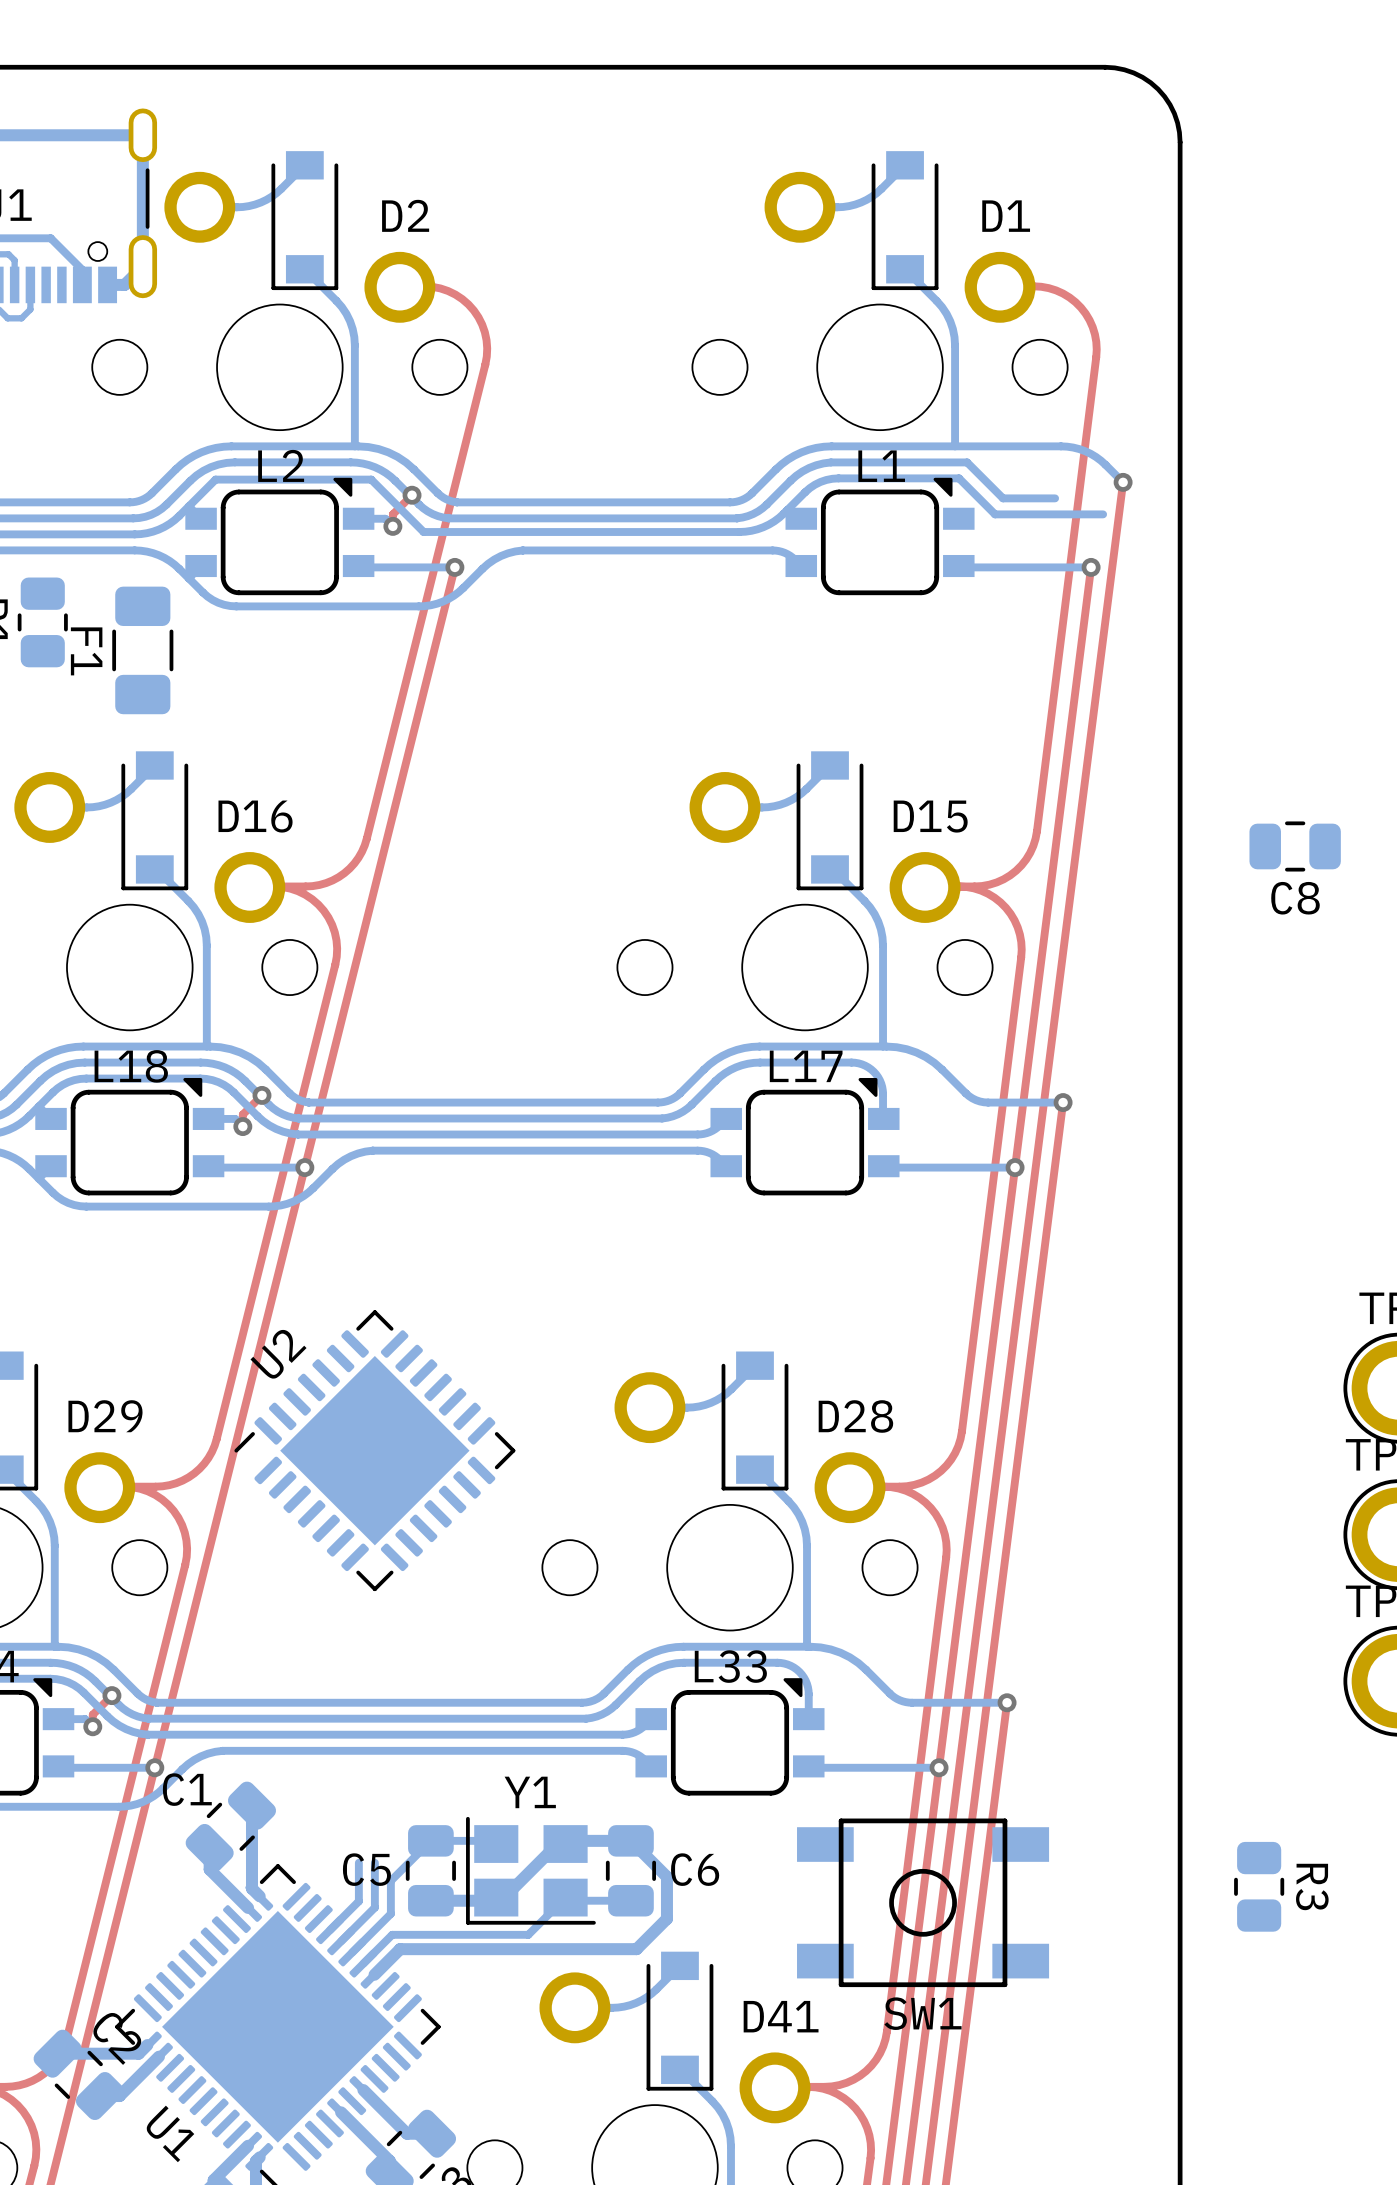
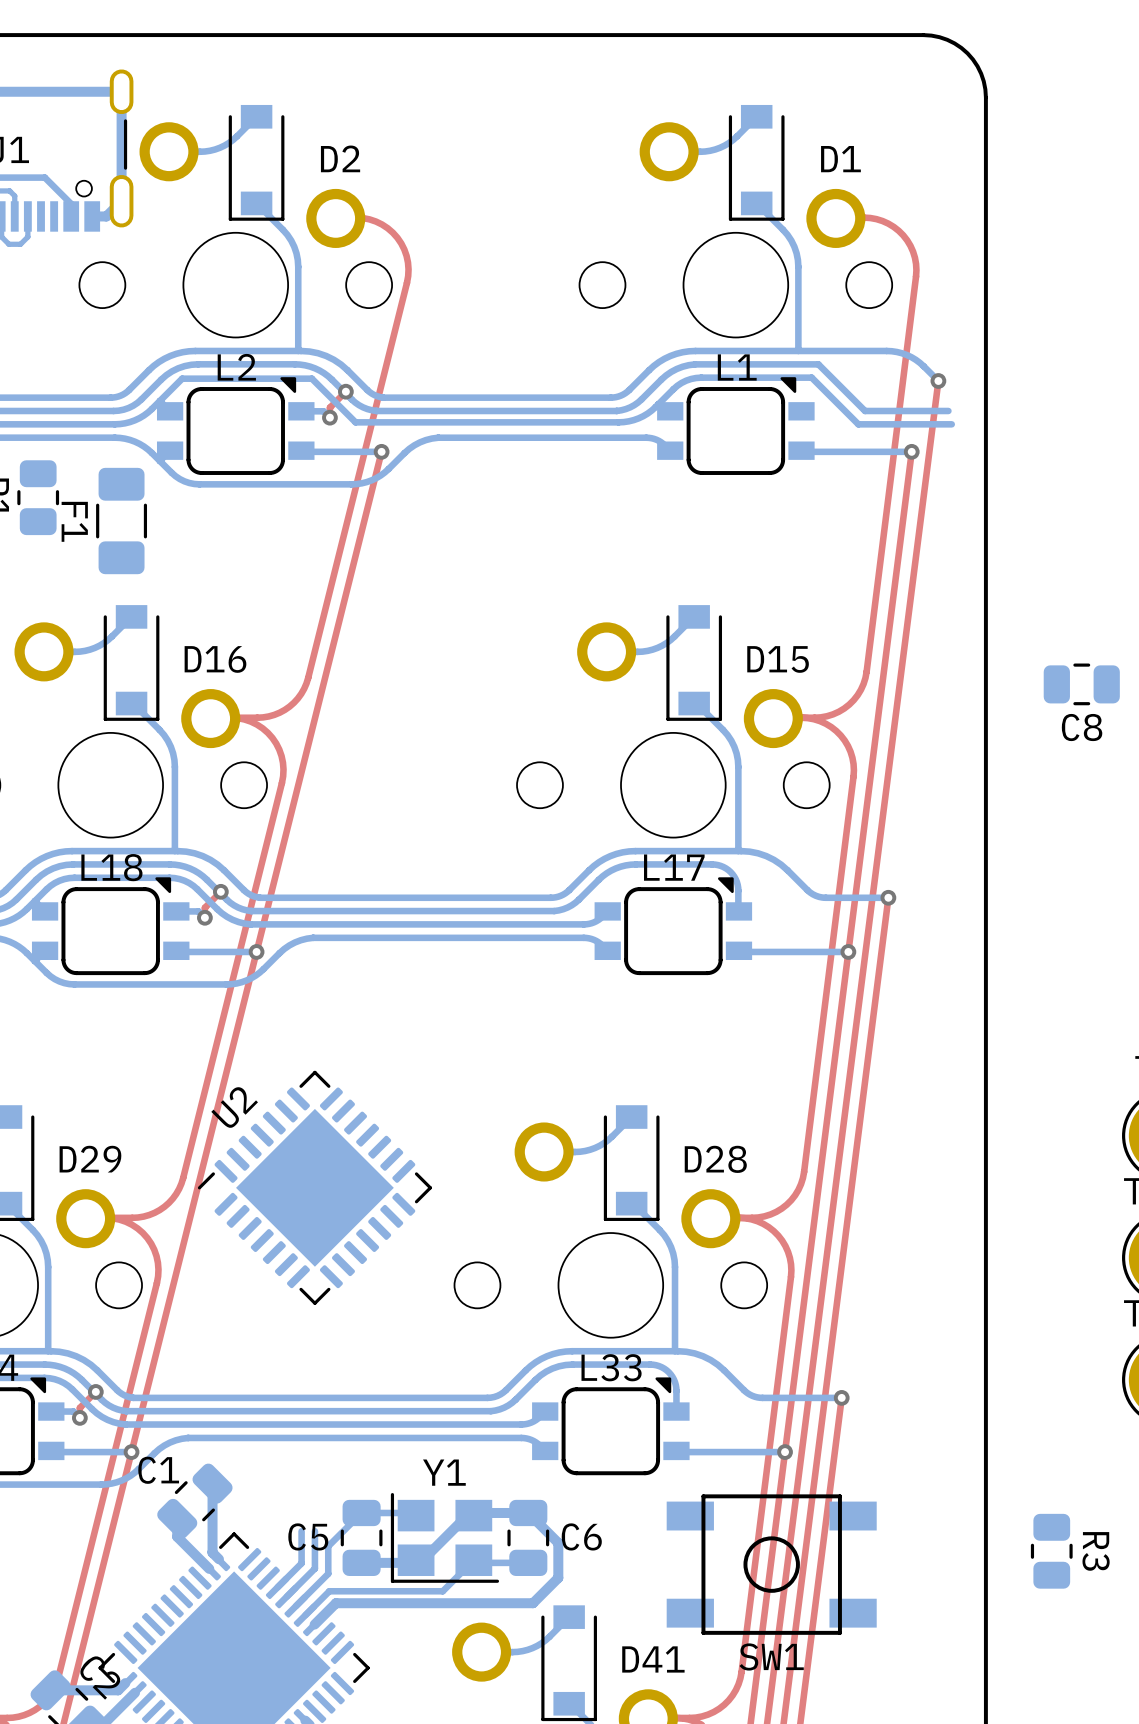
bottom track: (967, 462) (1003, 498) (1055, 498) -> (808, 364) (818, 364) (865, 410) (948, 410)
bottom track: (959, 478) (995, 514) (1103, 514) -> (801, 377) (811, 377) (858, 424) (951, 424)

